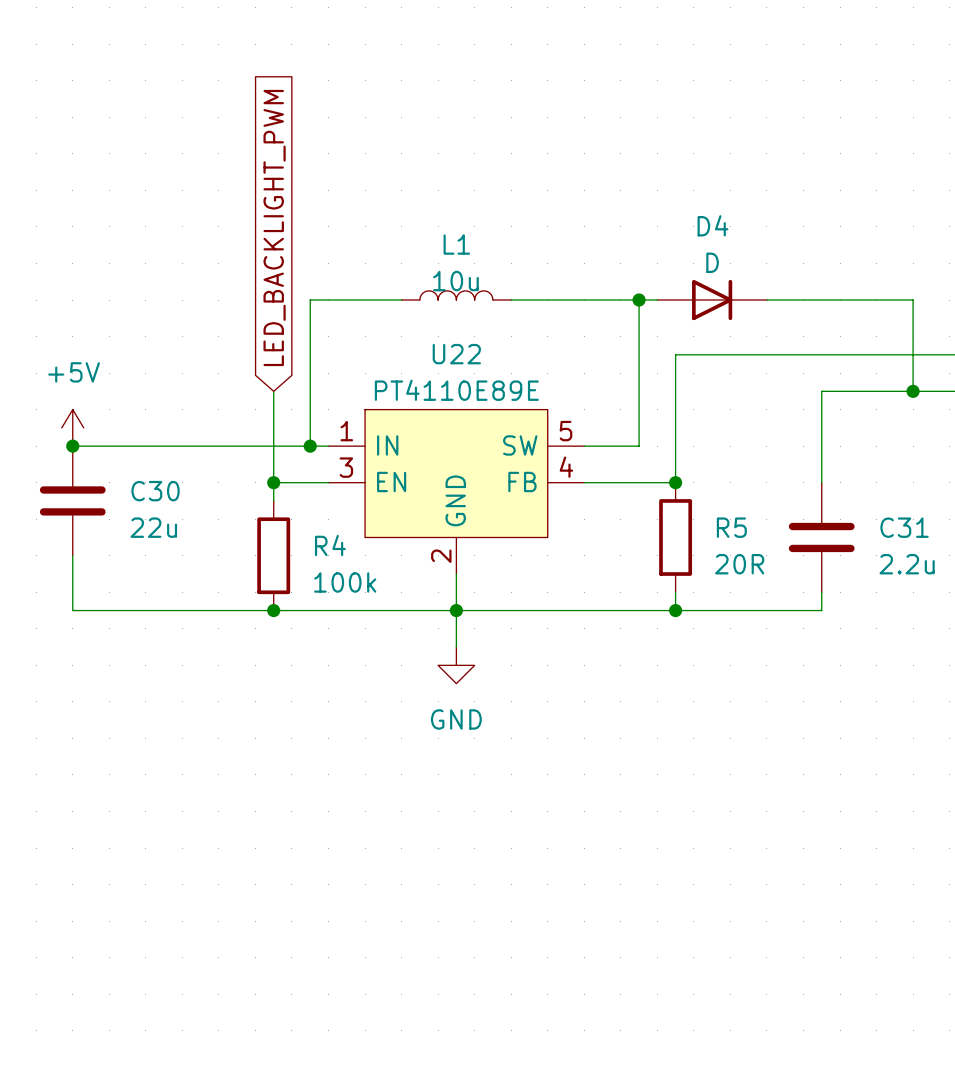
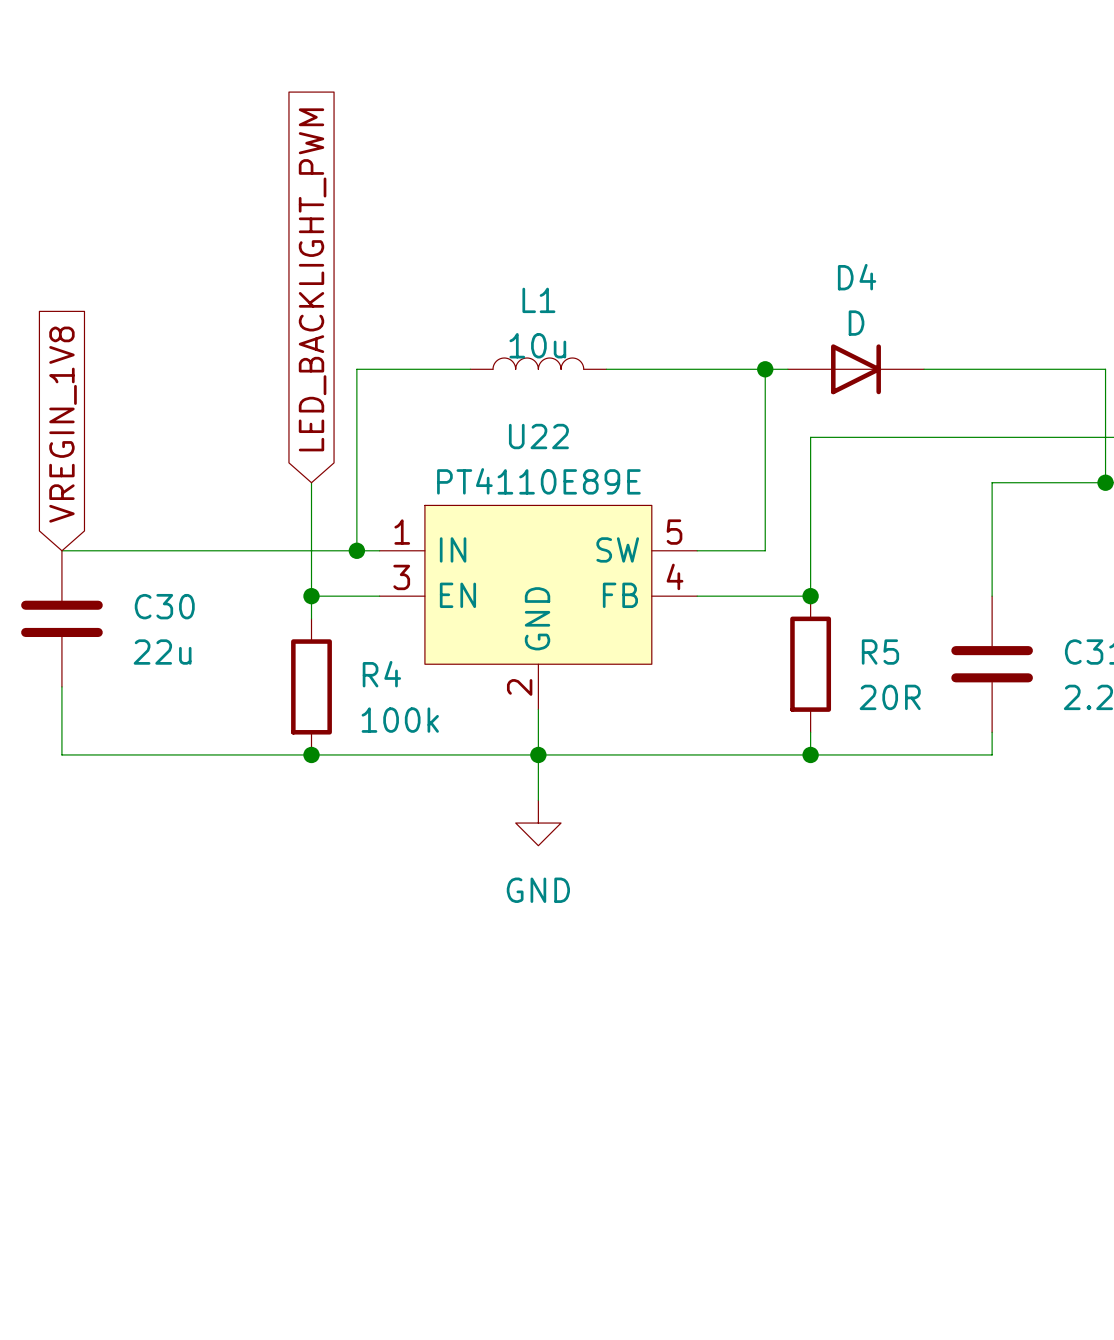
global label: none -> VREGIN_1V8 (63, 424)
power symbol: +5V (72, 427) -> none
junction: (72, 446) -> none

